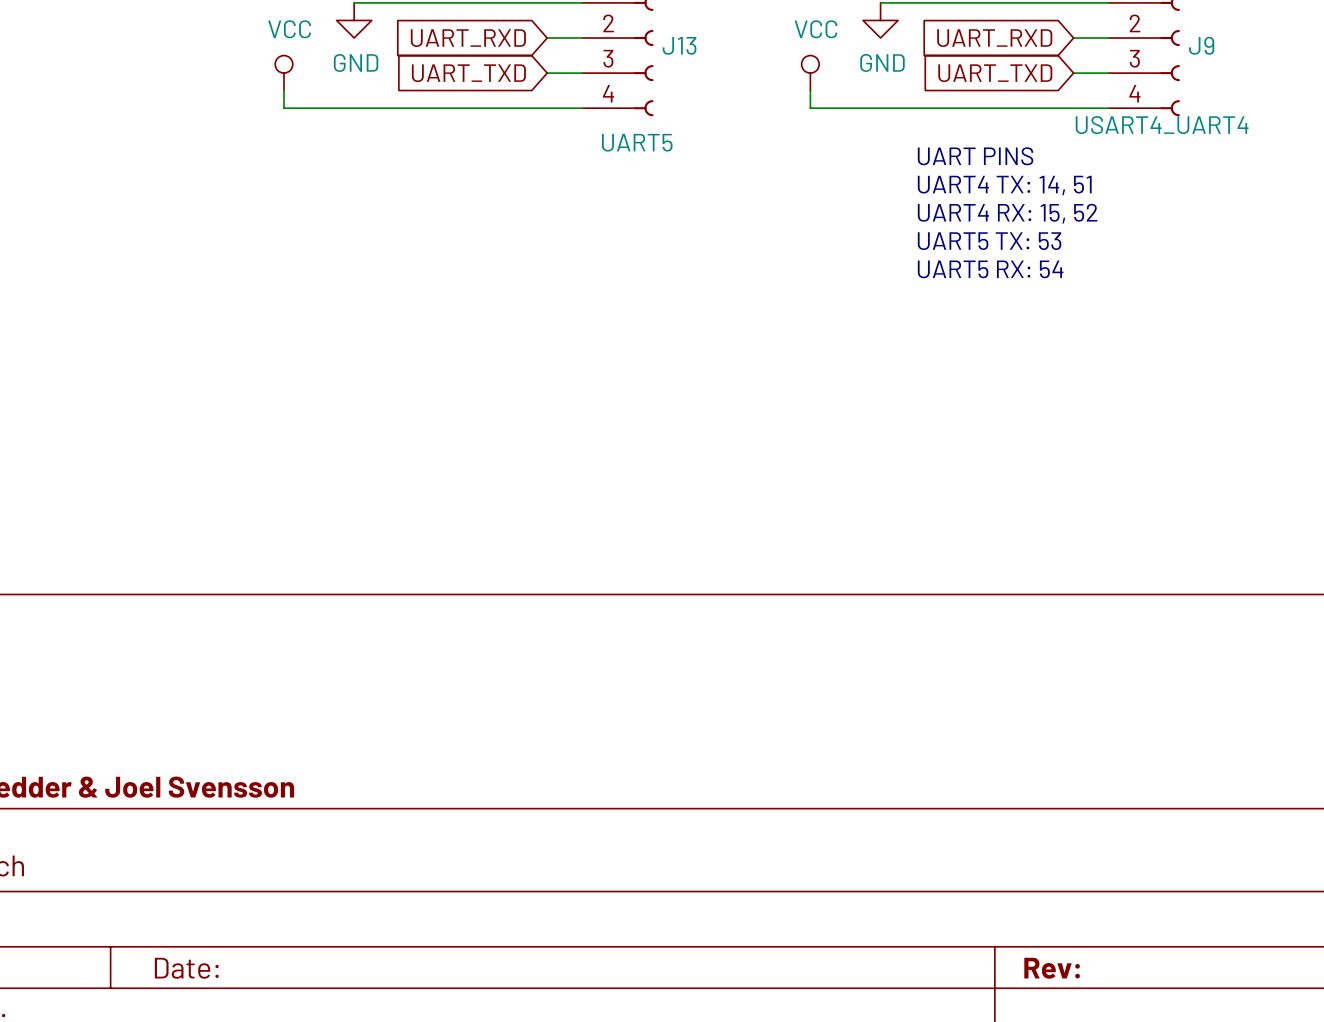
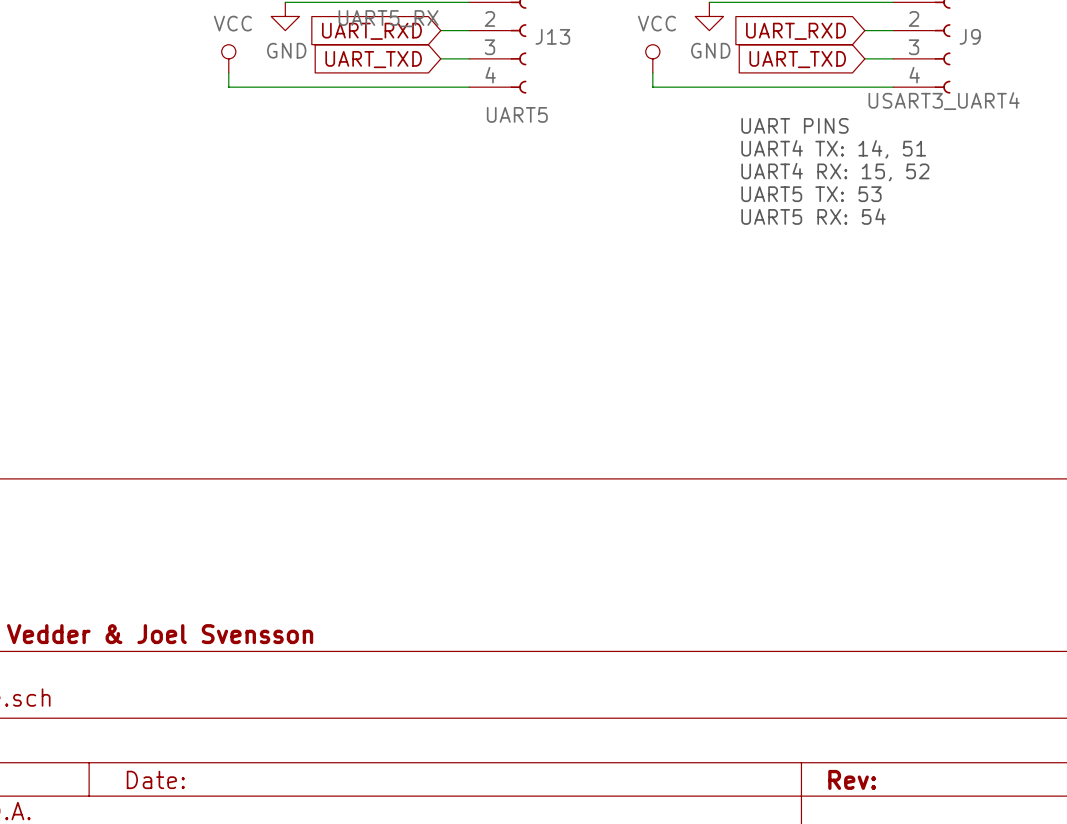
label: none -> UART5_RX (388, 18)
J9 value: USART4_UART4 (1162, 125) -> USART3_UART4 (944, 101)

